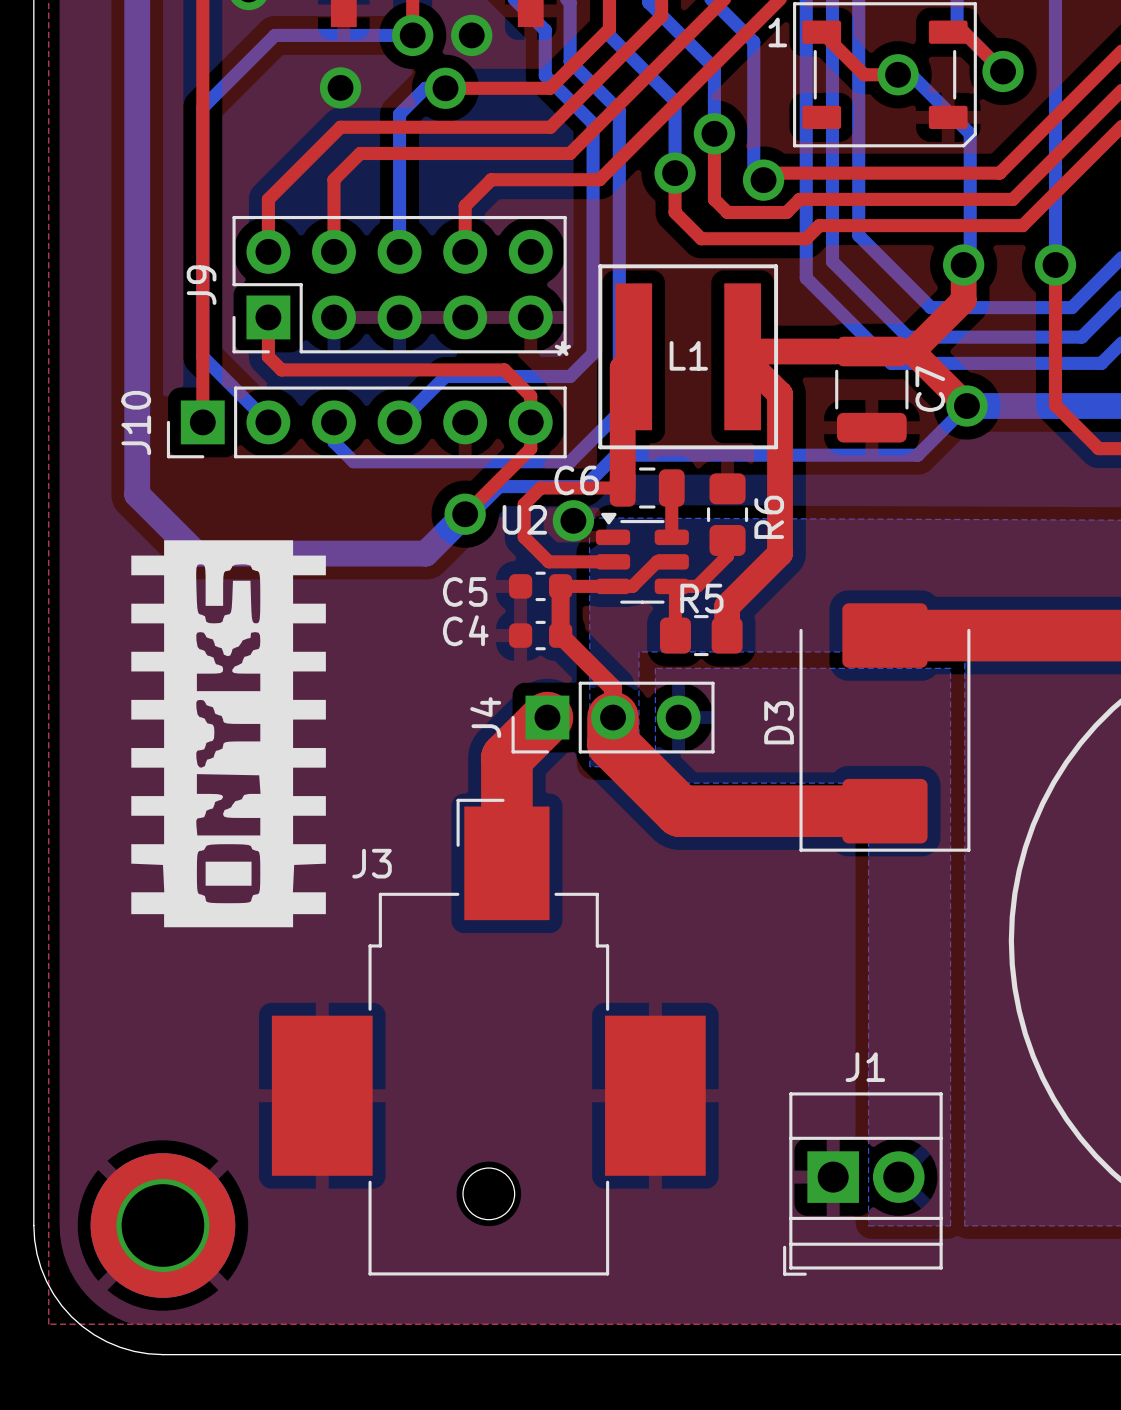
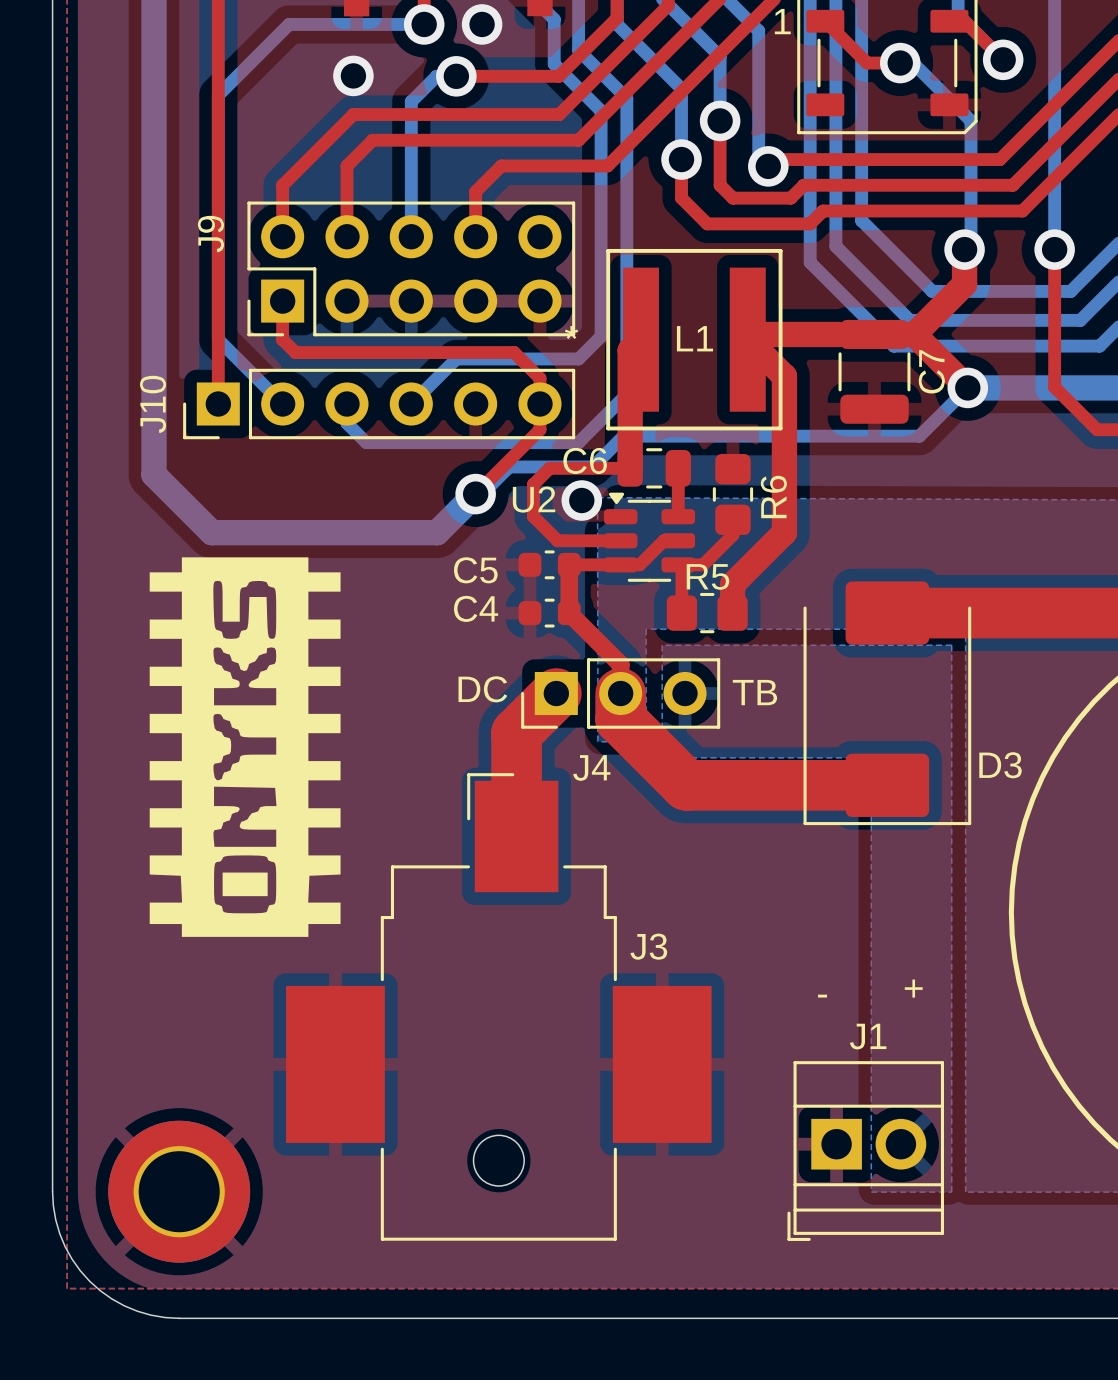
J9 name position: J9 (201, 285) -> J9 (210, 234)
text: none -> DC (482, 689)
text: none -> TB (754, 692)
J4 name rotation: 0° (485, 717) -> 90° clockwise (591, 767)
J4 name position: J4 (485, 717) -> J4 (591, 767)
D3 name rotation: 0° (779, 722) -> 90° clockwise (1000, 765)
D3 name position: D3 (779, 722) -> D3 (1000, 765)
drawing position: (228, 733) -> (245, 747)
J3 name position: J3 (372, 863) -> J3 (648, 946)
text: none -> + (913, 988)
text: none -> - (822, 996)

